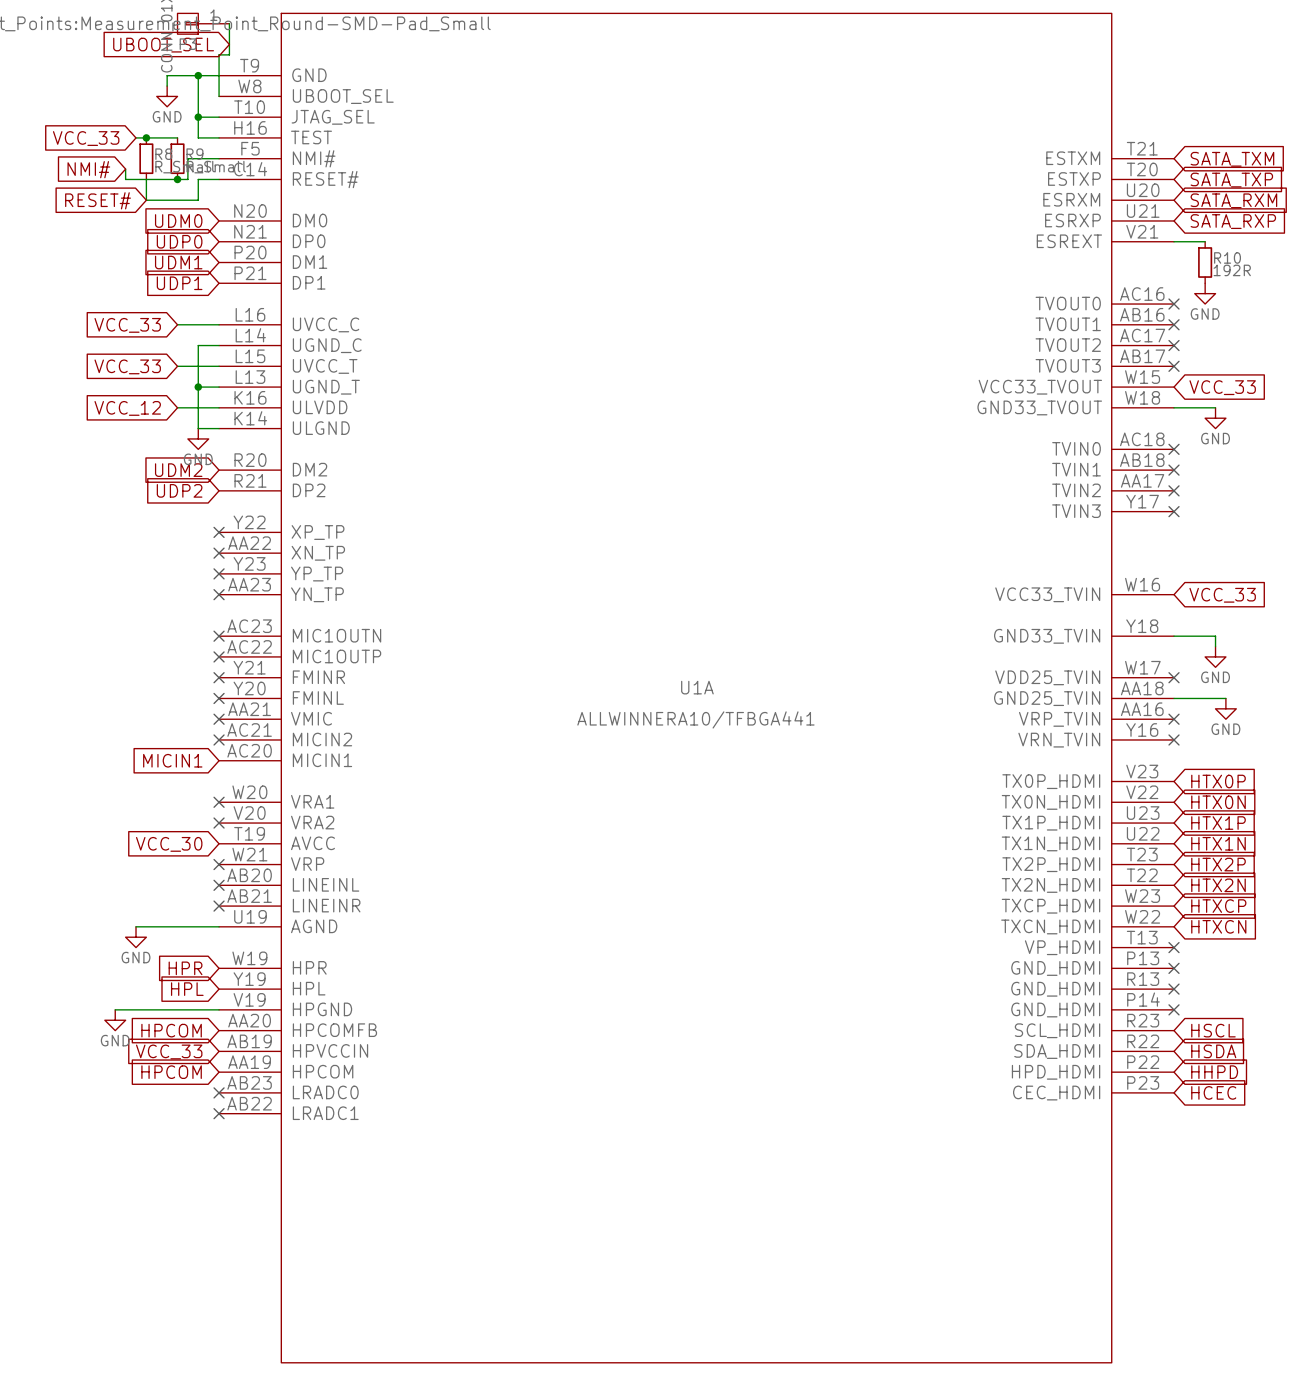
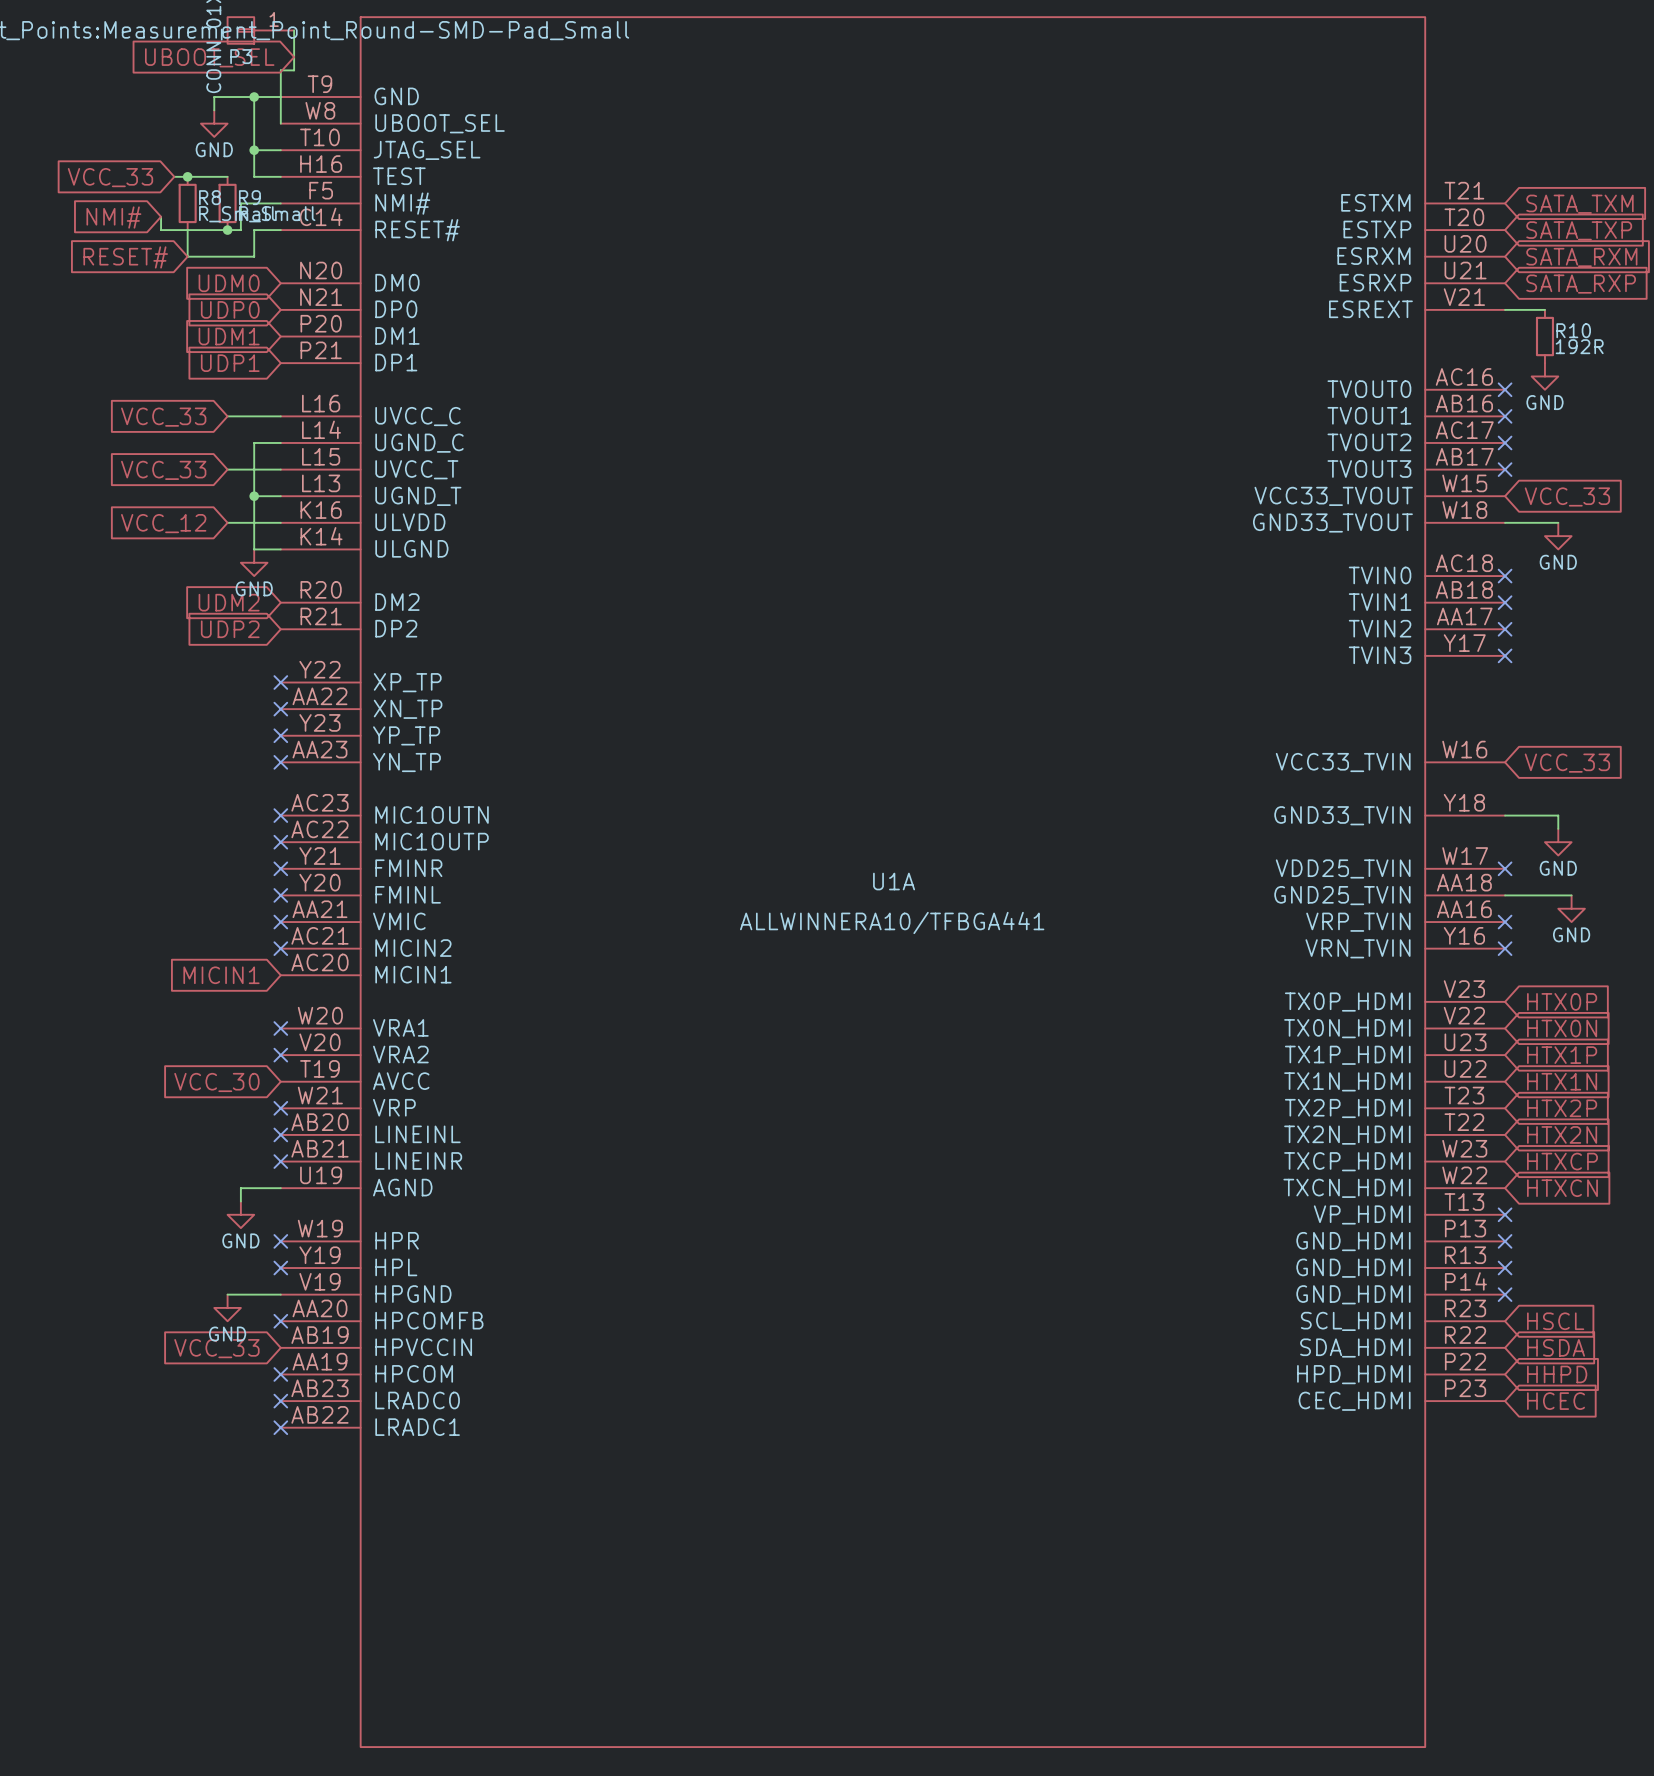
wire: (136, 926) (187, 926) -> (240, 1201) (240, 1188)
power symbol: GND (136, 937) -> none
power symbol: none -> GND (240, 1214)
global label: HPR (185, 968) -> none
no-connect mark: none -> (280, 1241)
global label: HPL (187, 989) -> none
no-connect mark: none -> (280, 1268)
wire: (115, 1009) (177, 1009) -> none
power symbol: GND (115, 1020) -> none
power symbol: none -> GND (227, 1307)
global label: HPCOM (171, 1030) -> none
no-connect mark: none -> (280, 1321)
global label: HPCOM (171, 1072) -> none
no-connect mark: none -> (280, 1374)

